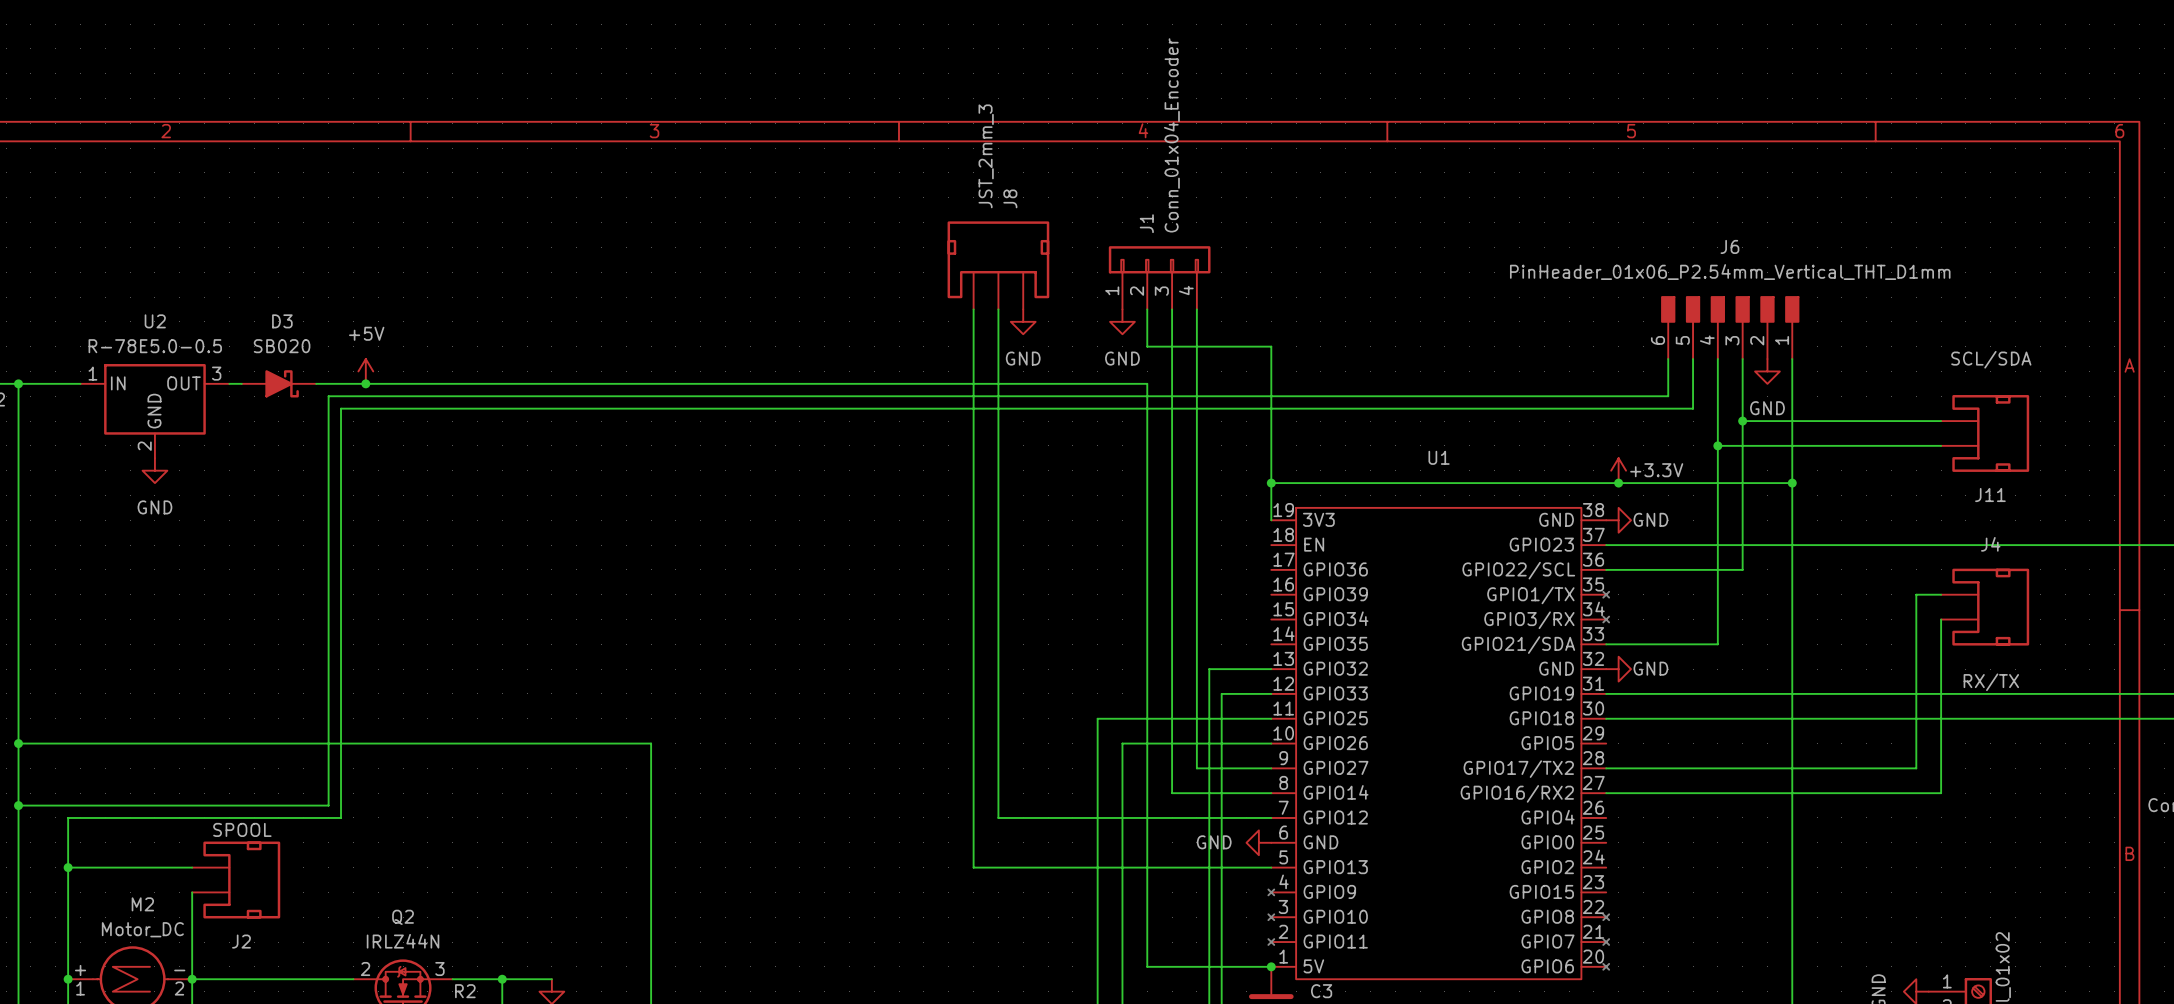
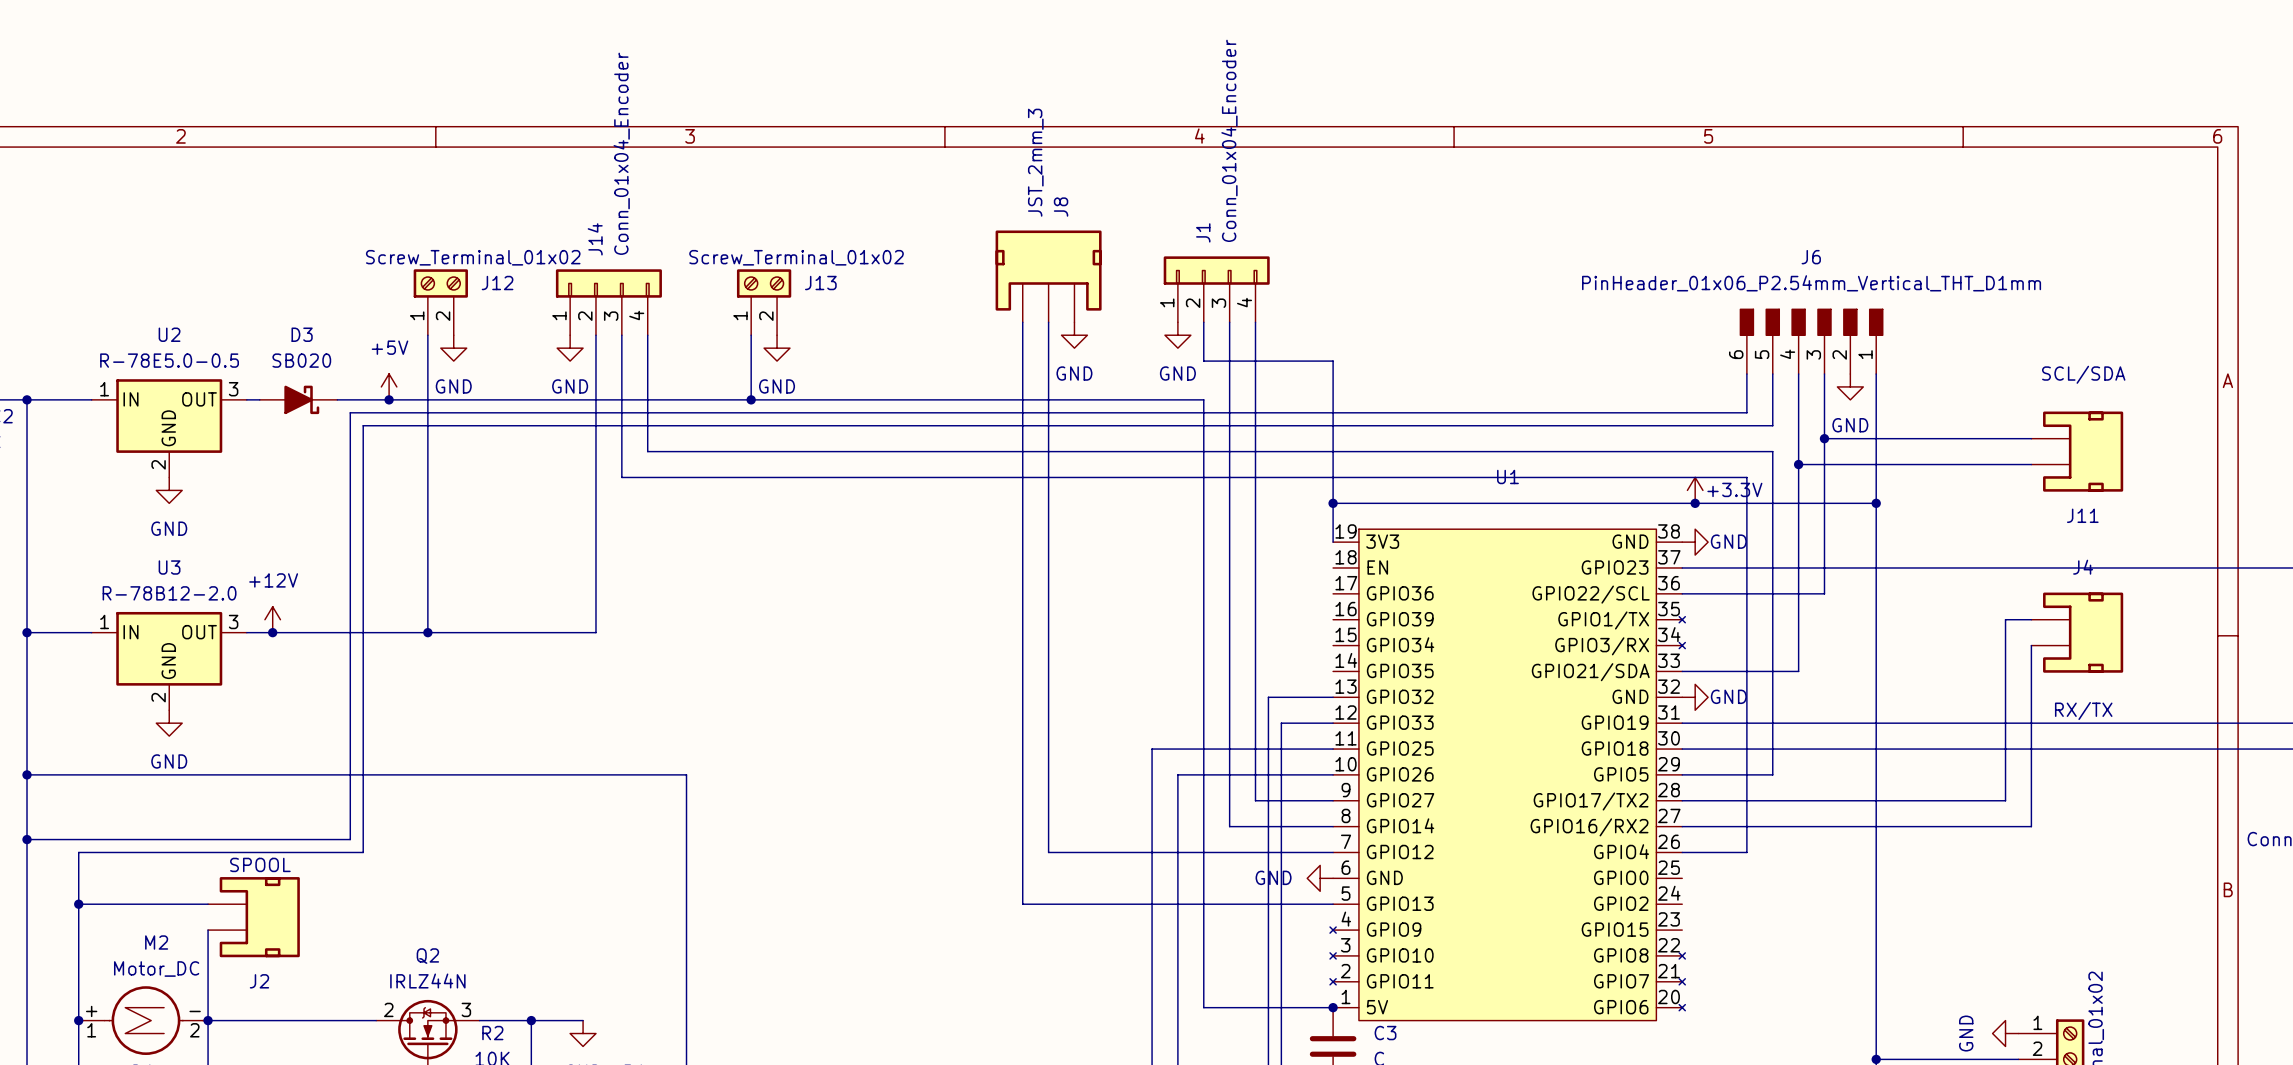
J12: none -> Screw_Terminal_01x02 (440, 302)
J14: none -> Conn_01x04_Encoder (608, 302)
J13: none -> Screw_Terminal_01x02 (764, 302)
wire: none -> (427, 335) (427, 632)
wire: none -> (595, 335) (595, 632) (246, 632)
wire: none -> (621, 335) (621, 477) (1746, 477) (1746, 852) (1682, 852)
wire: none -> (647, 335) (647, 451) (1772, 451) (1772, 774) (1682, 774)
wire: none -> (751, 335) (751, 399)
power symbol: none -> GND (453, 348)
power symbol: none -> GND (570, 348)
power symbol: none -> GND (777, 348)
junction: none -> (751, 399)
power symbol: none -> +12V (272, 619)
wire: none -> (27, 632) (91, 632)
junction: none -> (27, 632)
junction: none -> (272, 632)
junction: none -> (427, 632)
U3: none -> R-78B12-2.0 (169, 661)
power symbol: none -> GND (169, 723)

